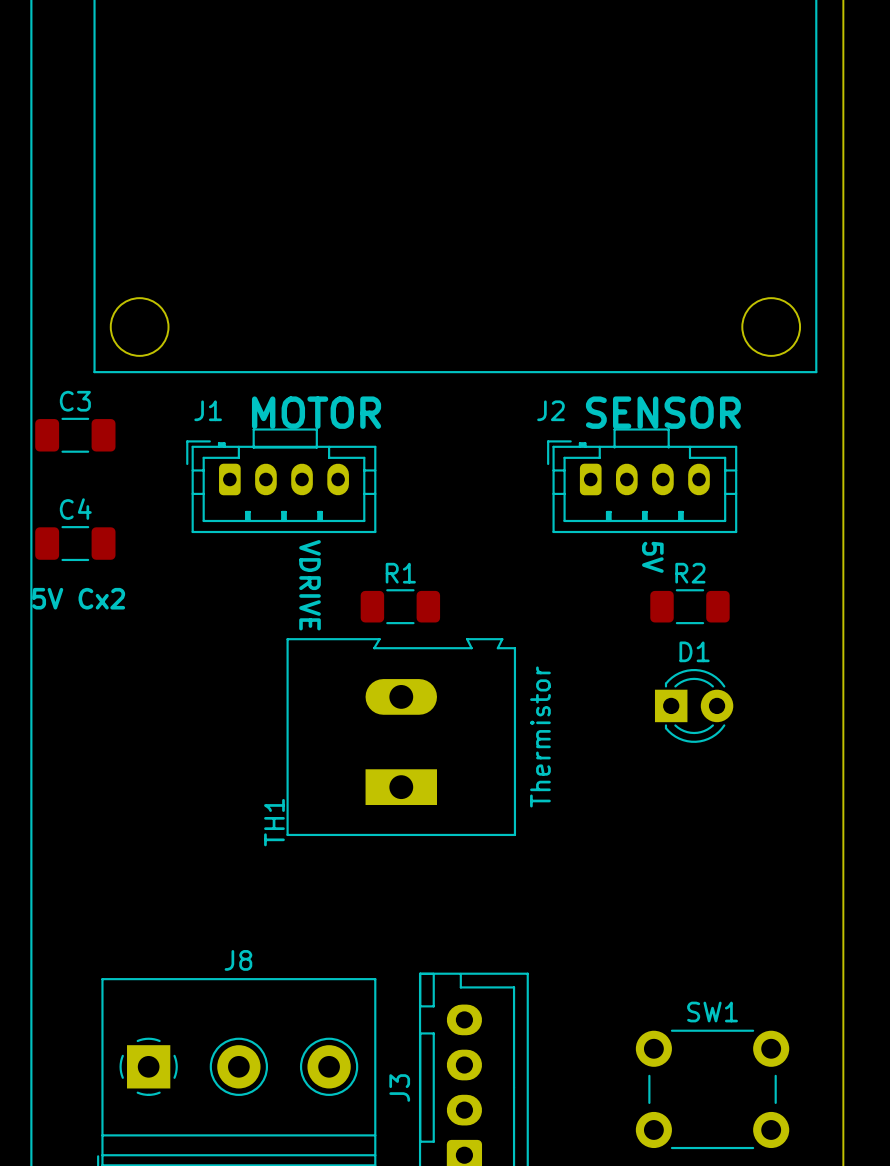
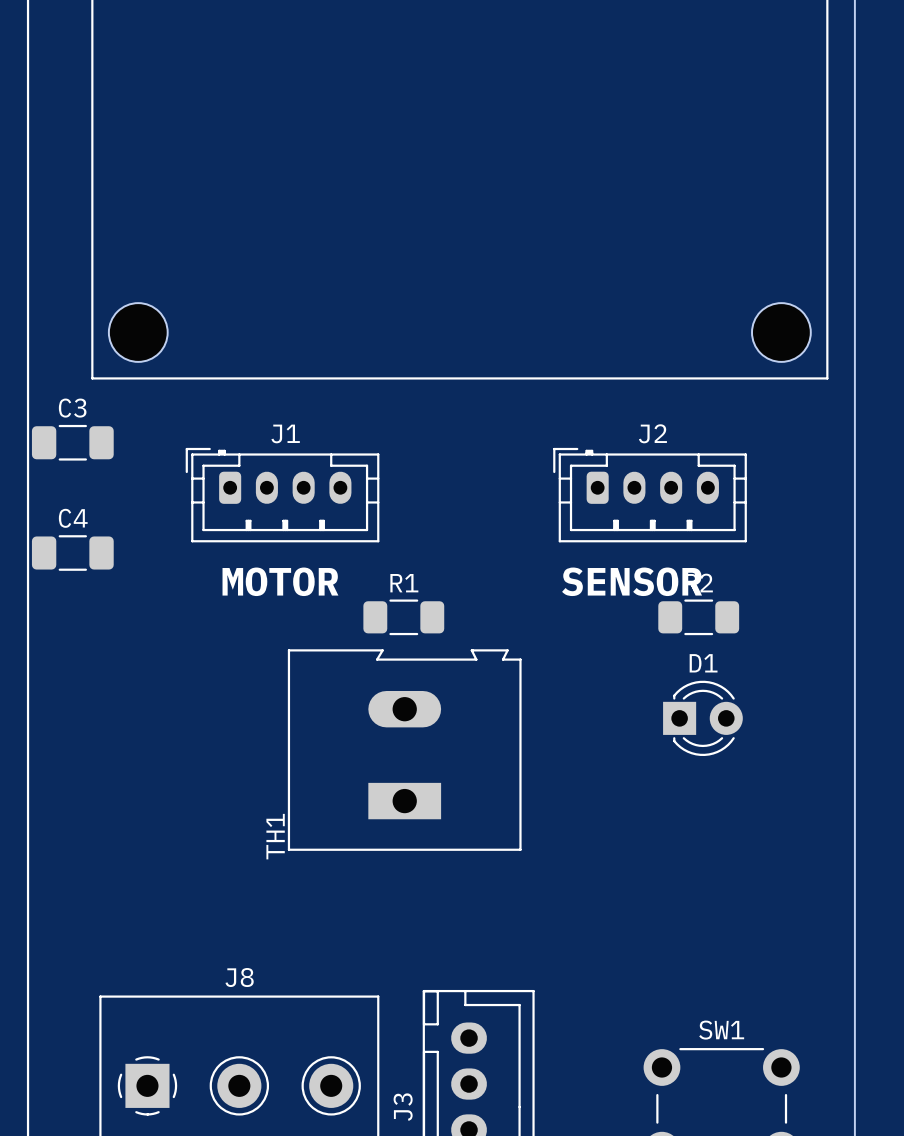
J1 name position: J1 (208, 410) -> J1 (285, 433)
J2 name position: J2 (550, 410) -> J2 (652, 433)
text position: MOTOR (316, 412) -> MOTOR (280, 581)
text position: SENSOR (663, 412) -> SENSOR (632, 581)
line: (253, 429) (253, 447) (316, 447) (316, 429) (253, 429) -> none
line: (614, 447) (614, 429) (668, 429) (668, 447) -> none
text: 5V (652, 557) -> none
text: VDRIVE (310, 585) -> none
text: 5V Cx2 (78, 598) -> none
TH1 value: Thermistor (540, 736) -> none

